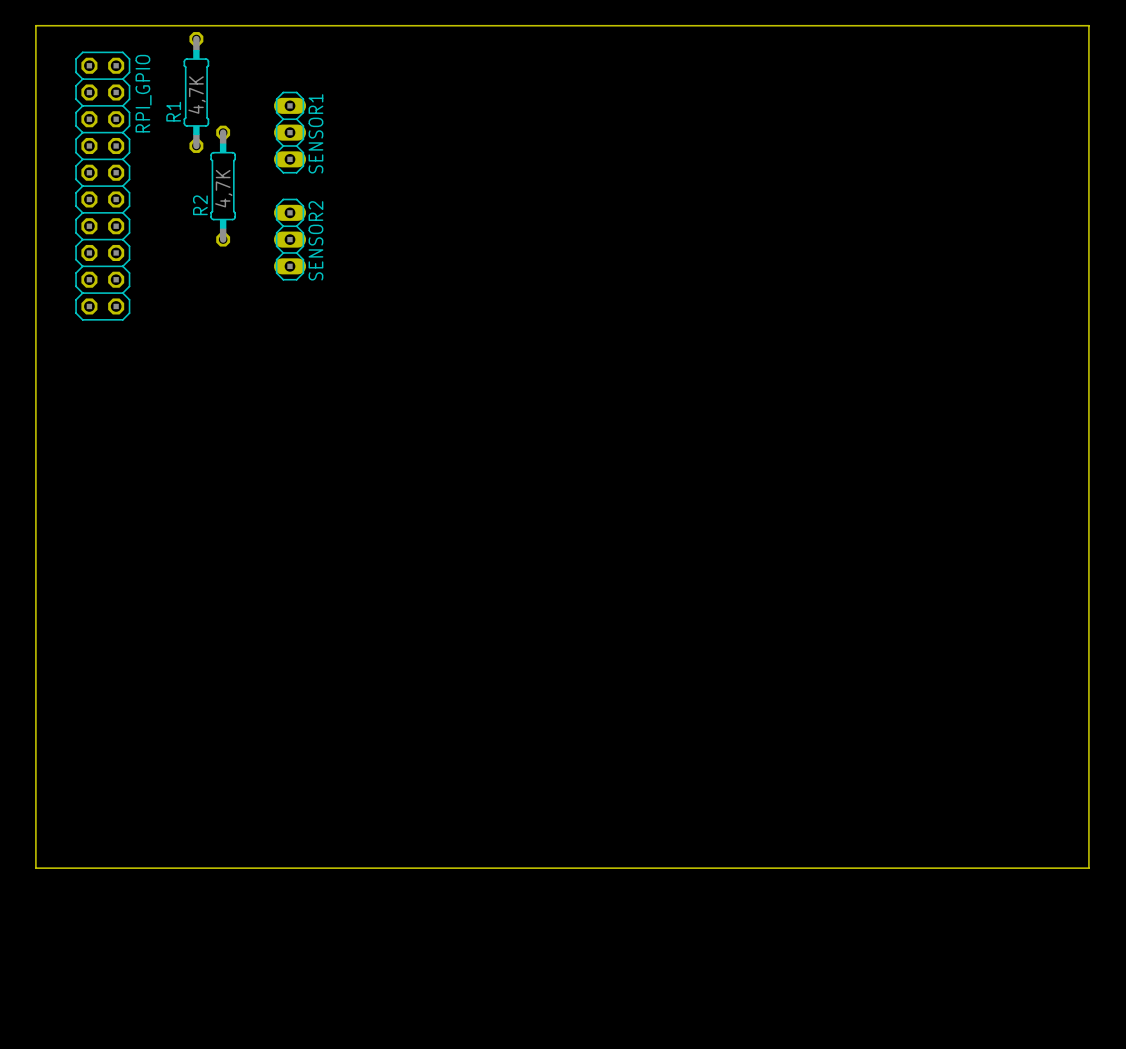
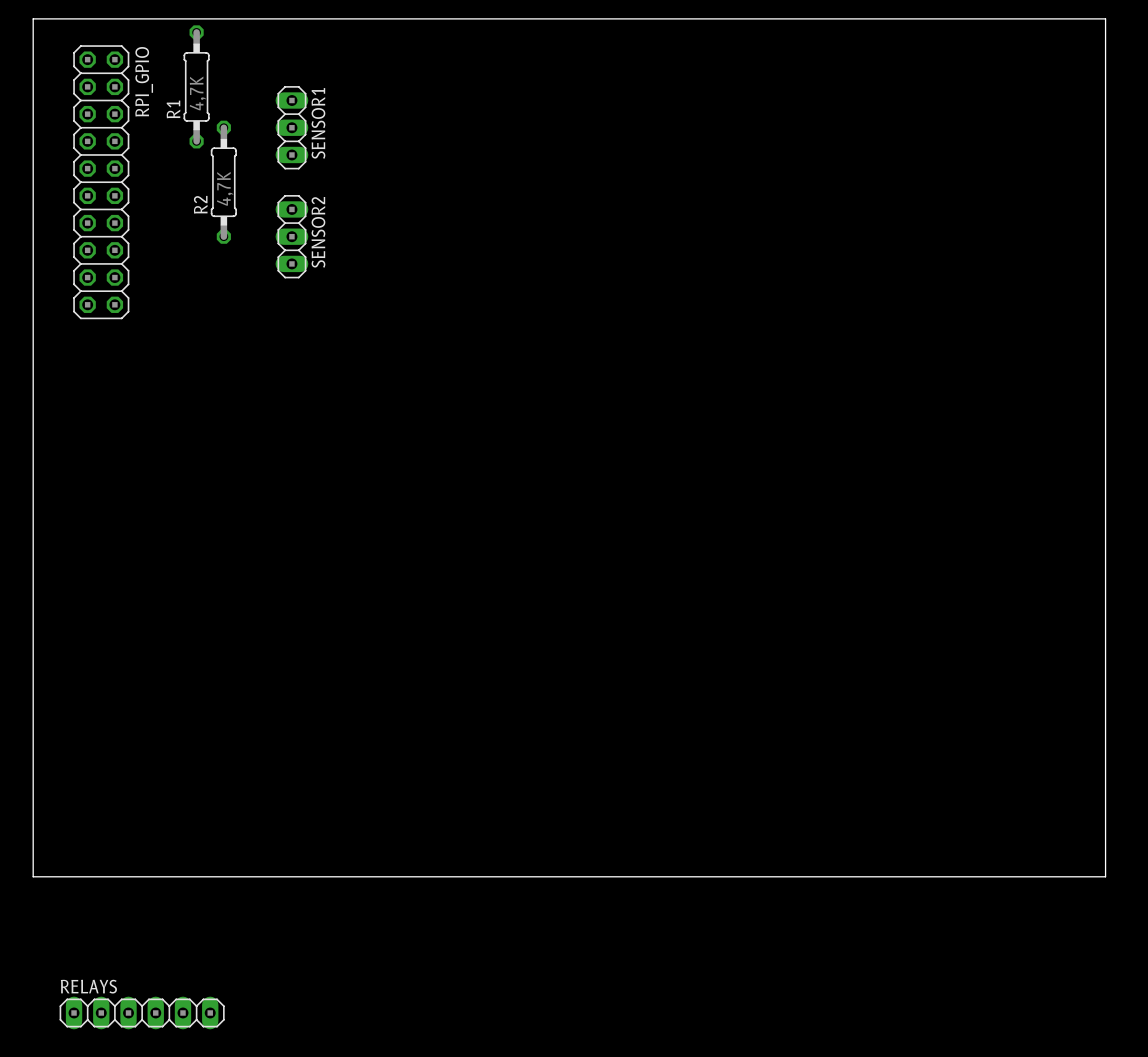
RELAYS: none -> (142, 1012)

